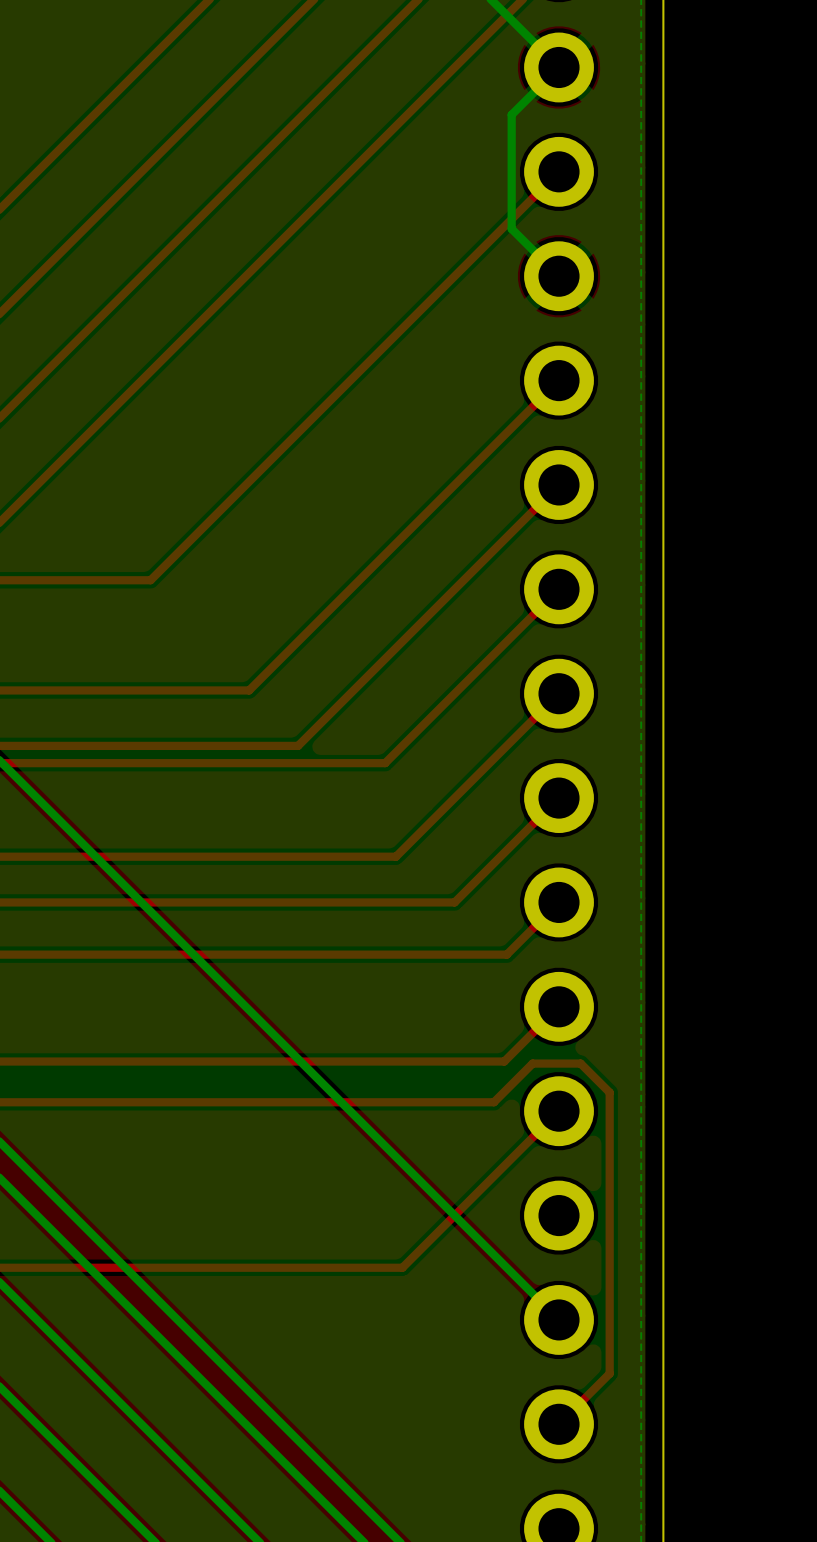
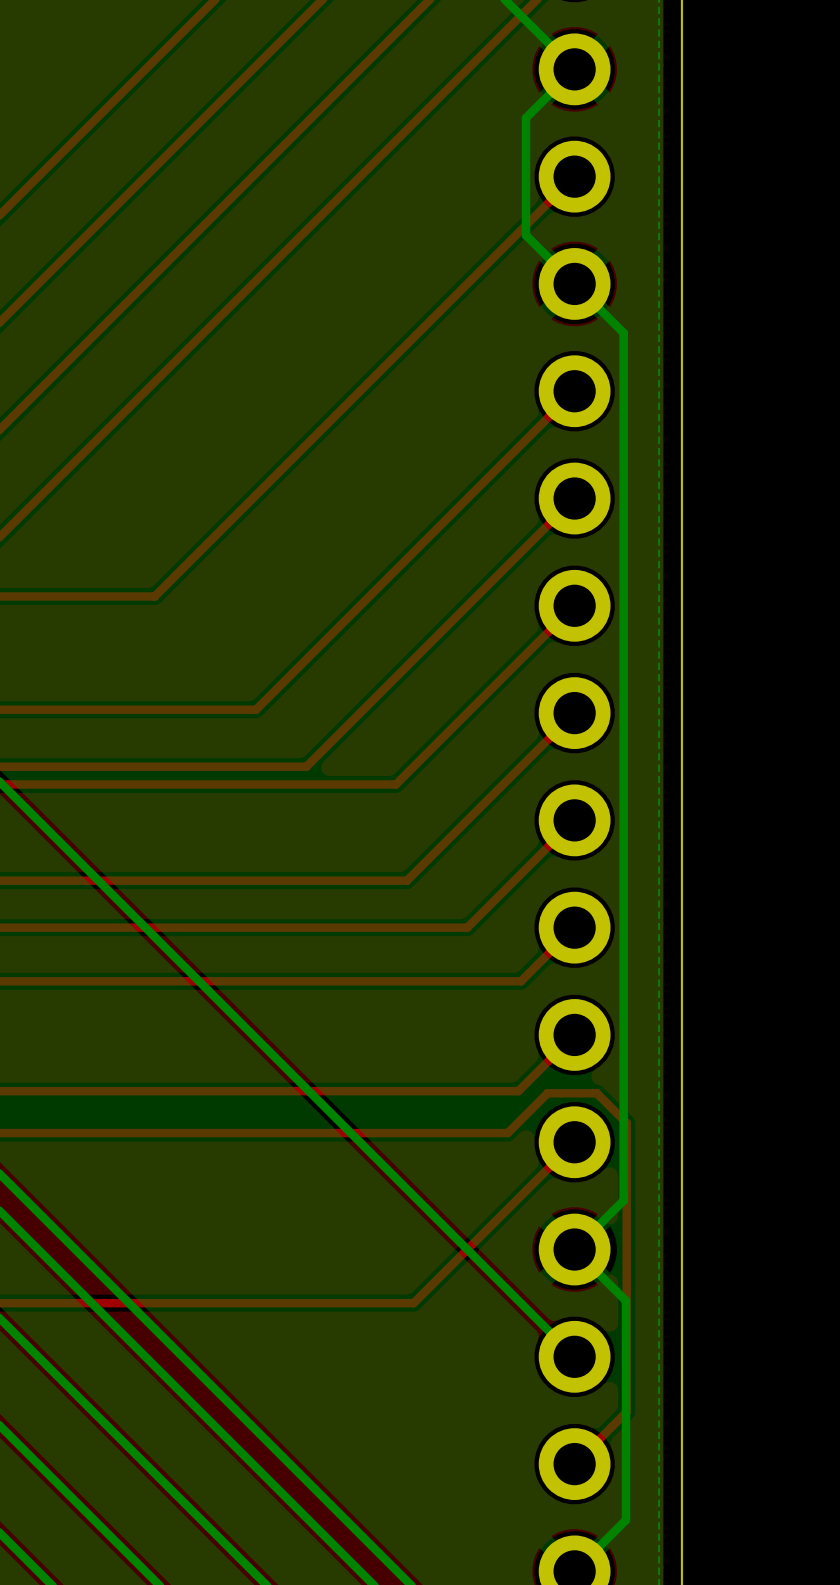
bottom track: none -> (574, 283) (623, 332) (623, 1200) (574, 1249) (625, 1300) (625, 1520) (574, 1571)

